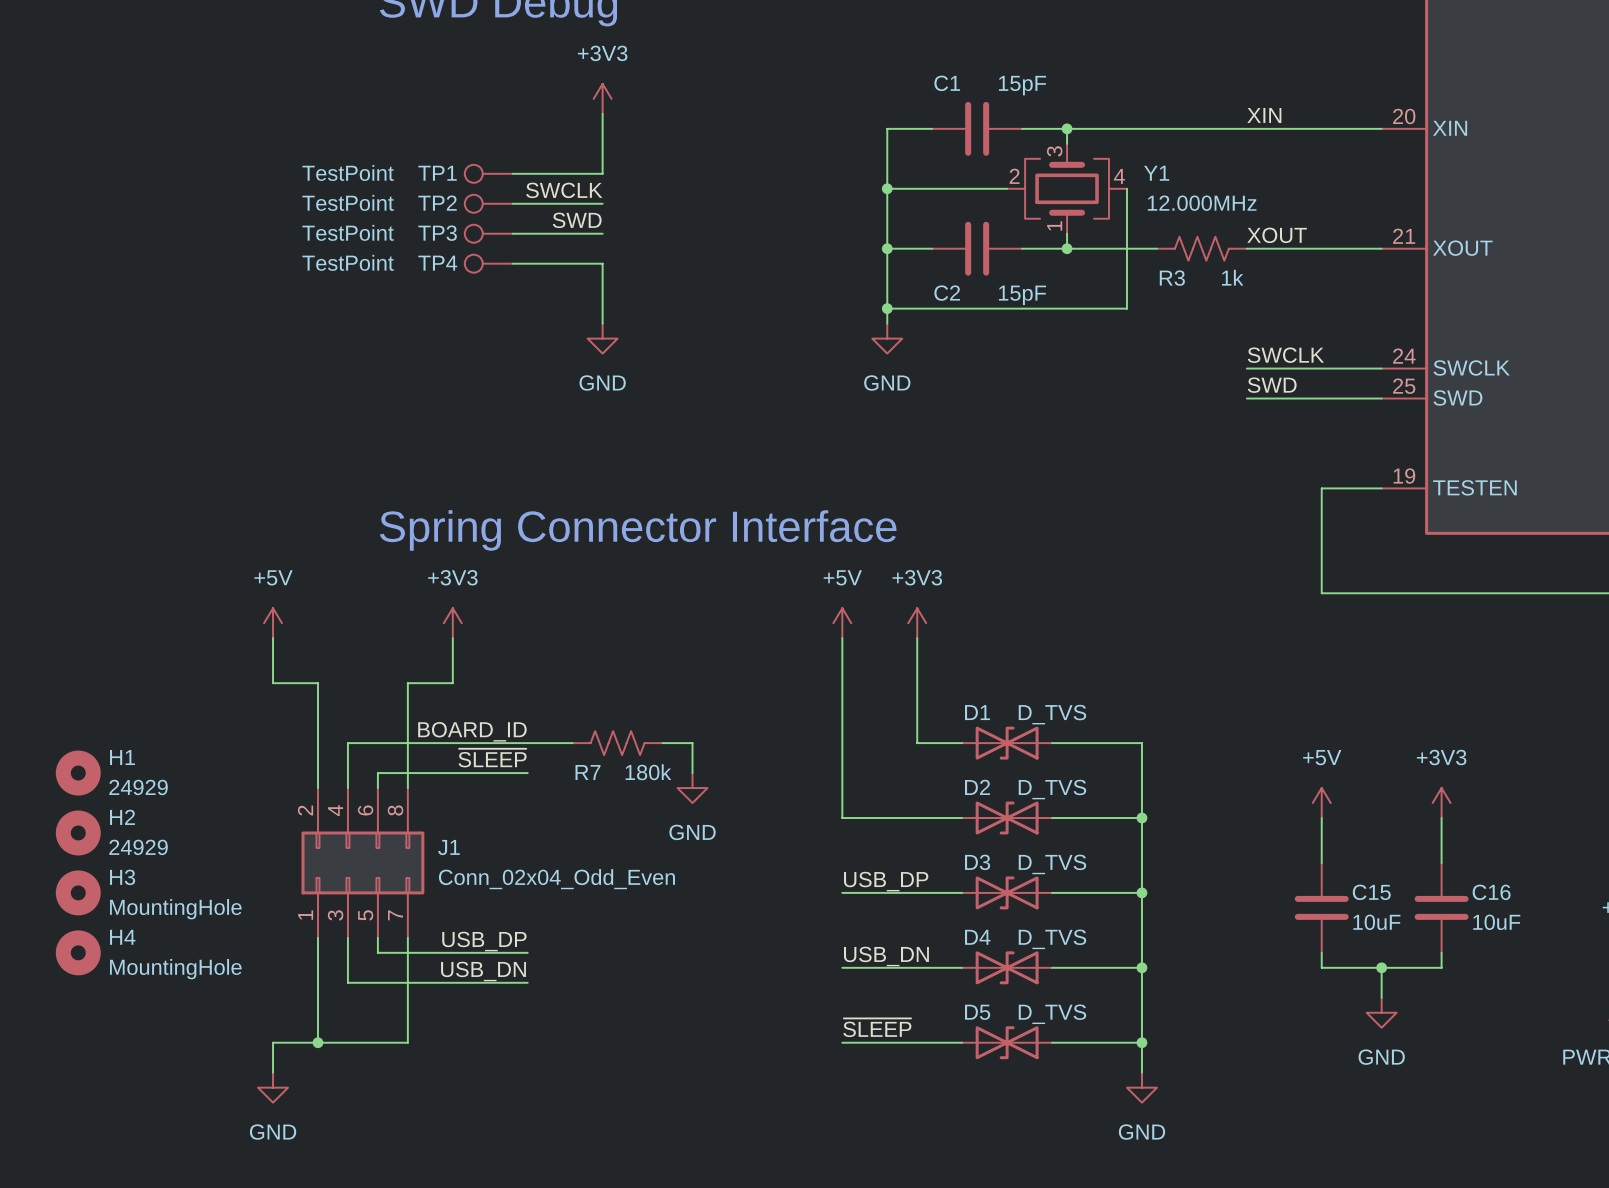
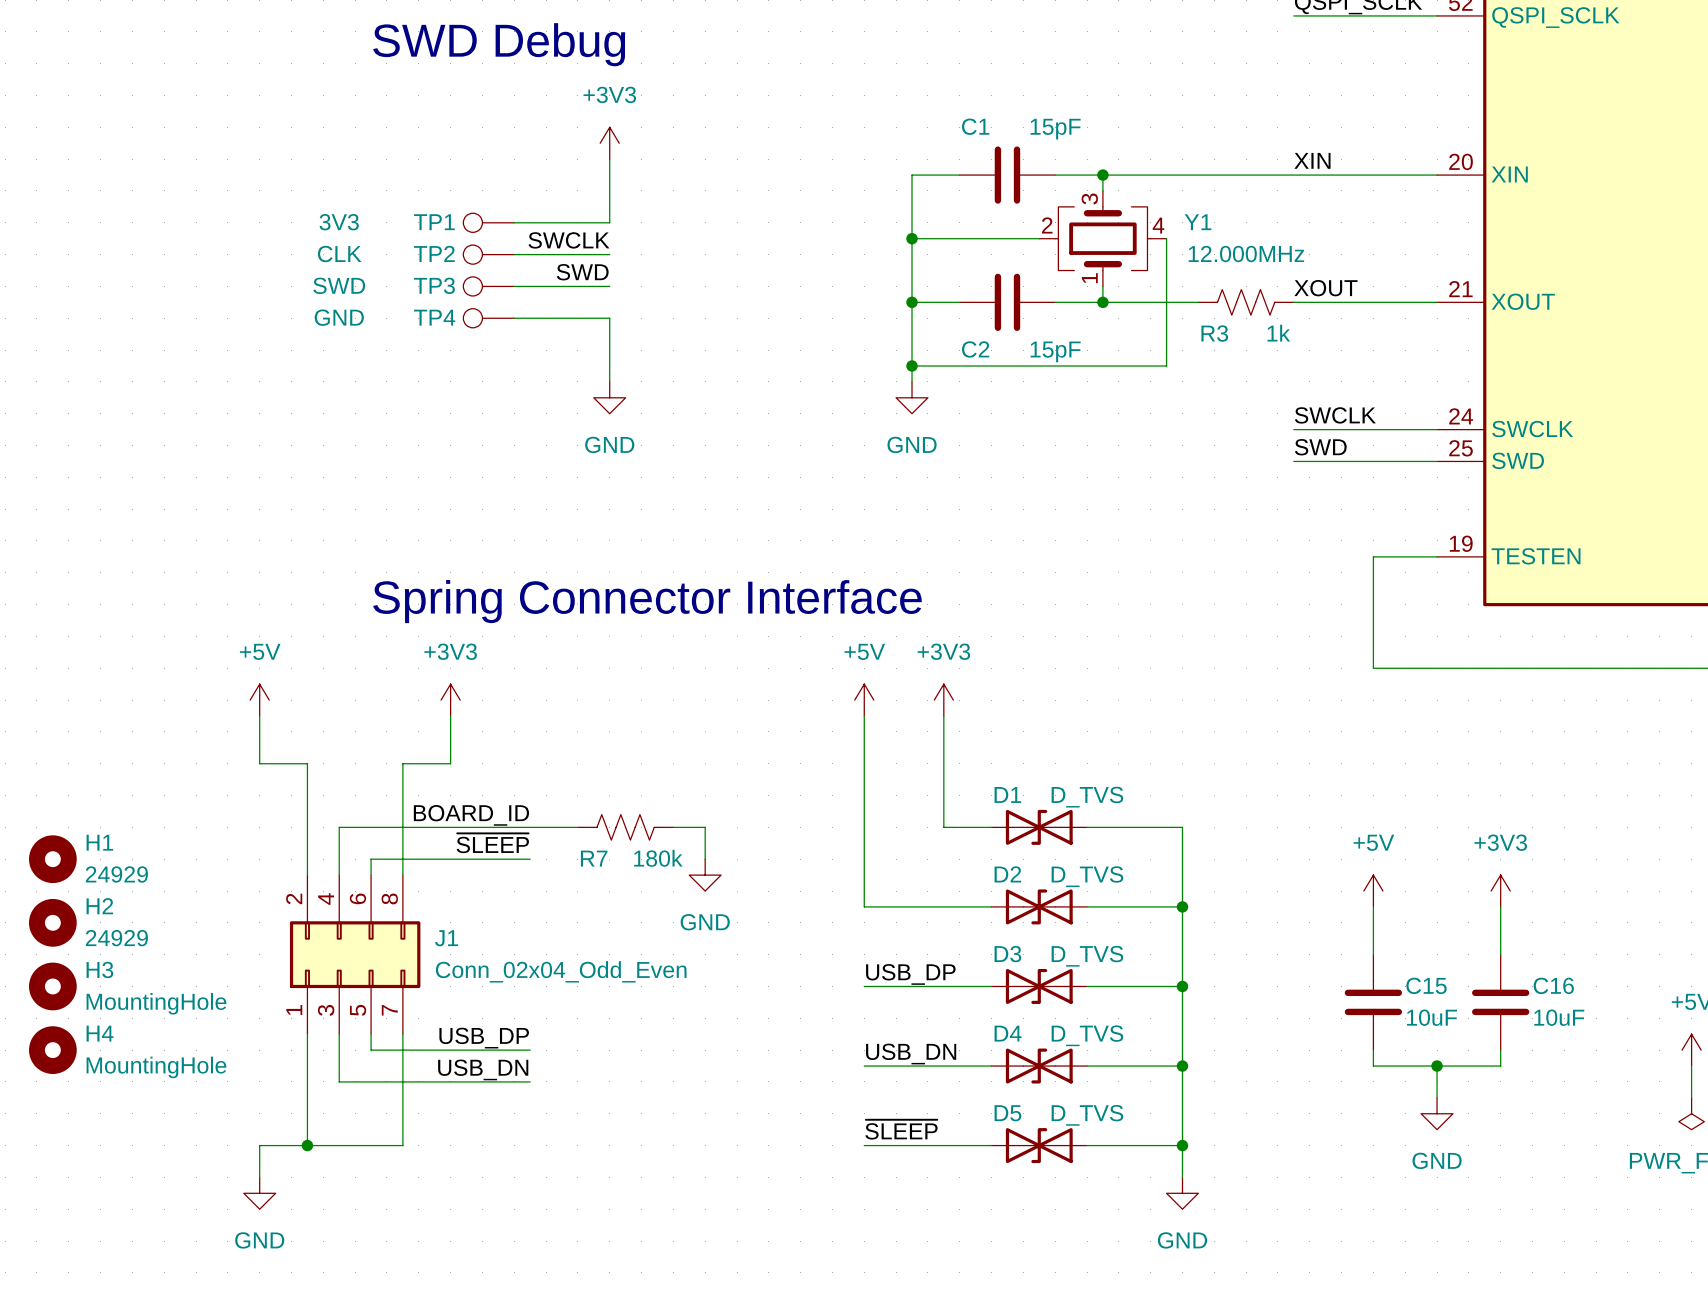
TP1 value: TestPoint (348, 172) -> 3V3 (339, 222)
TP2 value: TestPoint (348, 202) -> CLK (339, 254)
TP3 value: TestPoint (348, 232) -> SWD (339, 285)
TP4 value: TestPoint (348, 262) -> GND (339, 317)

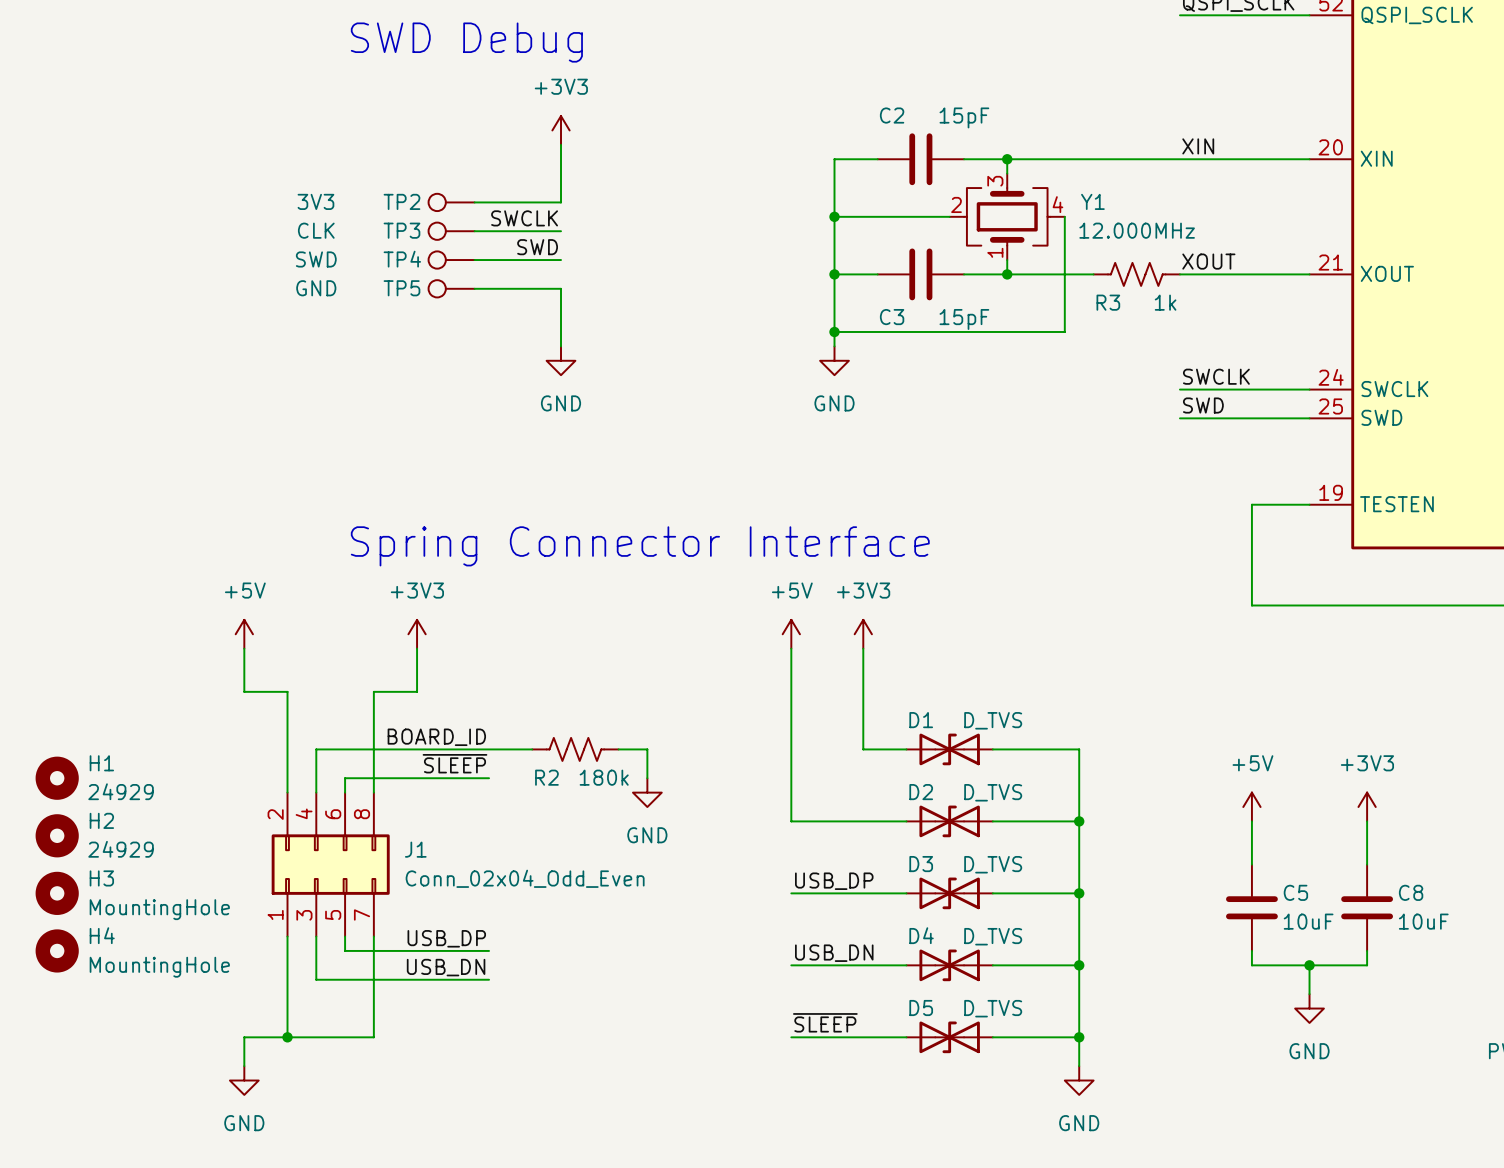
C1 name: C1 (975, 126) -> C2 (892, 115)
TP1 name: TP1 (434, 222) -> TP2 (401, 201)
TP2 name: TP2 (434, 253) -> TP3 (401, 230)
TP3 name: TP3 (434, 285) -> TP4 (402, 259)
TP4 name: TP4 (434, 317) -> TP5 (401, 288)
C2 name: C2 (975, 349) -> C3 (892, 317)
R7 name: R7 (594, 858) -> R2 (546, 777)
C15 name: C15 (1426, 985) -> C5 (1295, 892)
C16 name: C16 (1553, 985) -> C8 (1411, 892)

